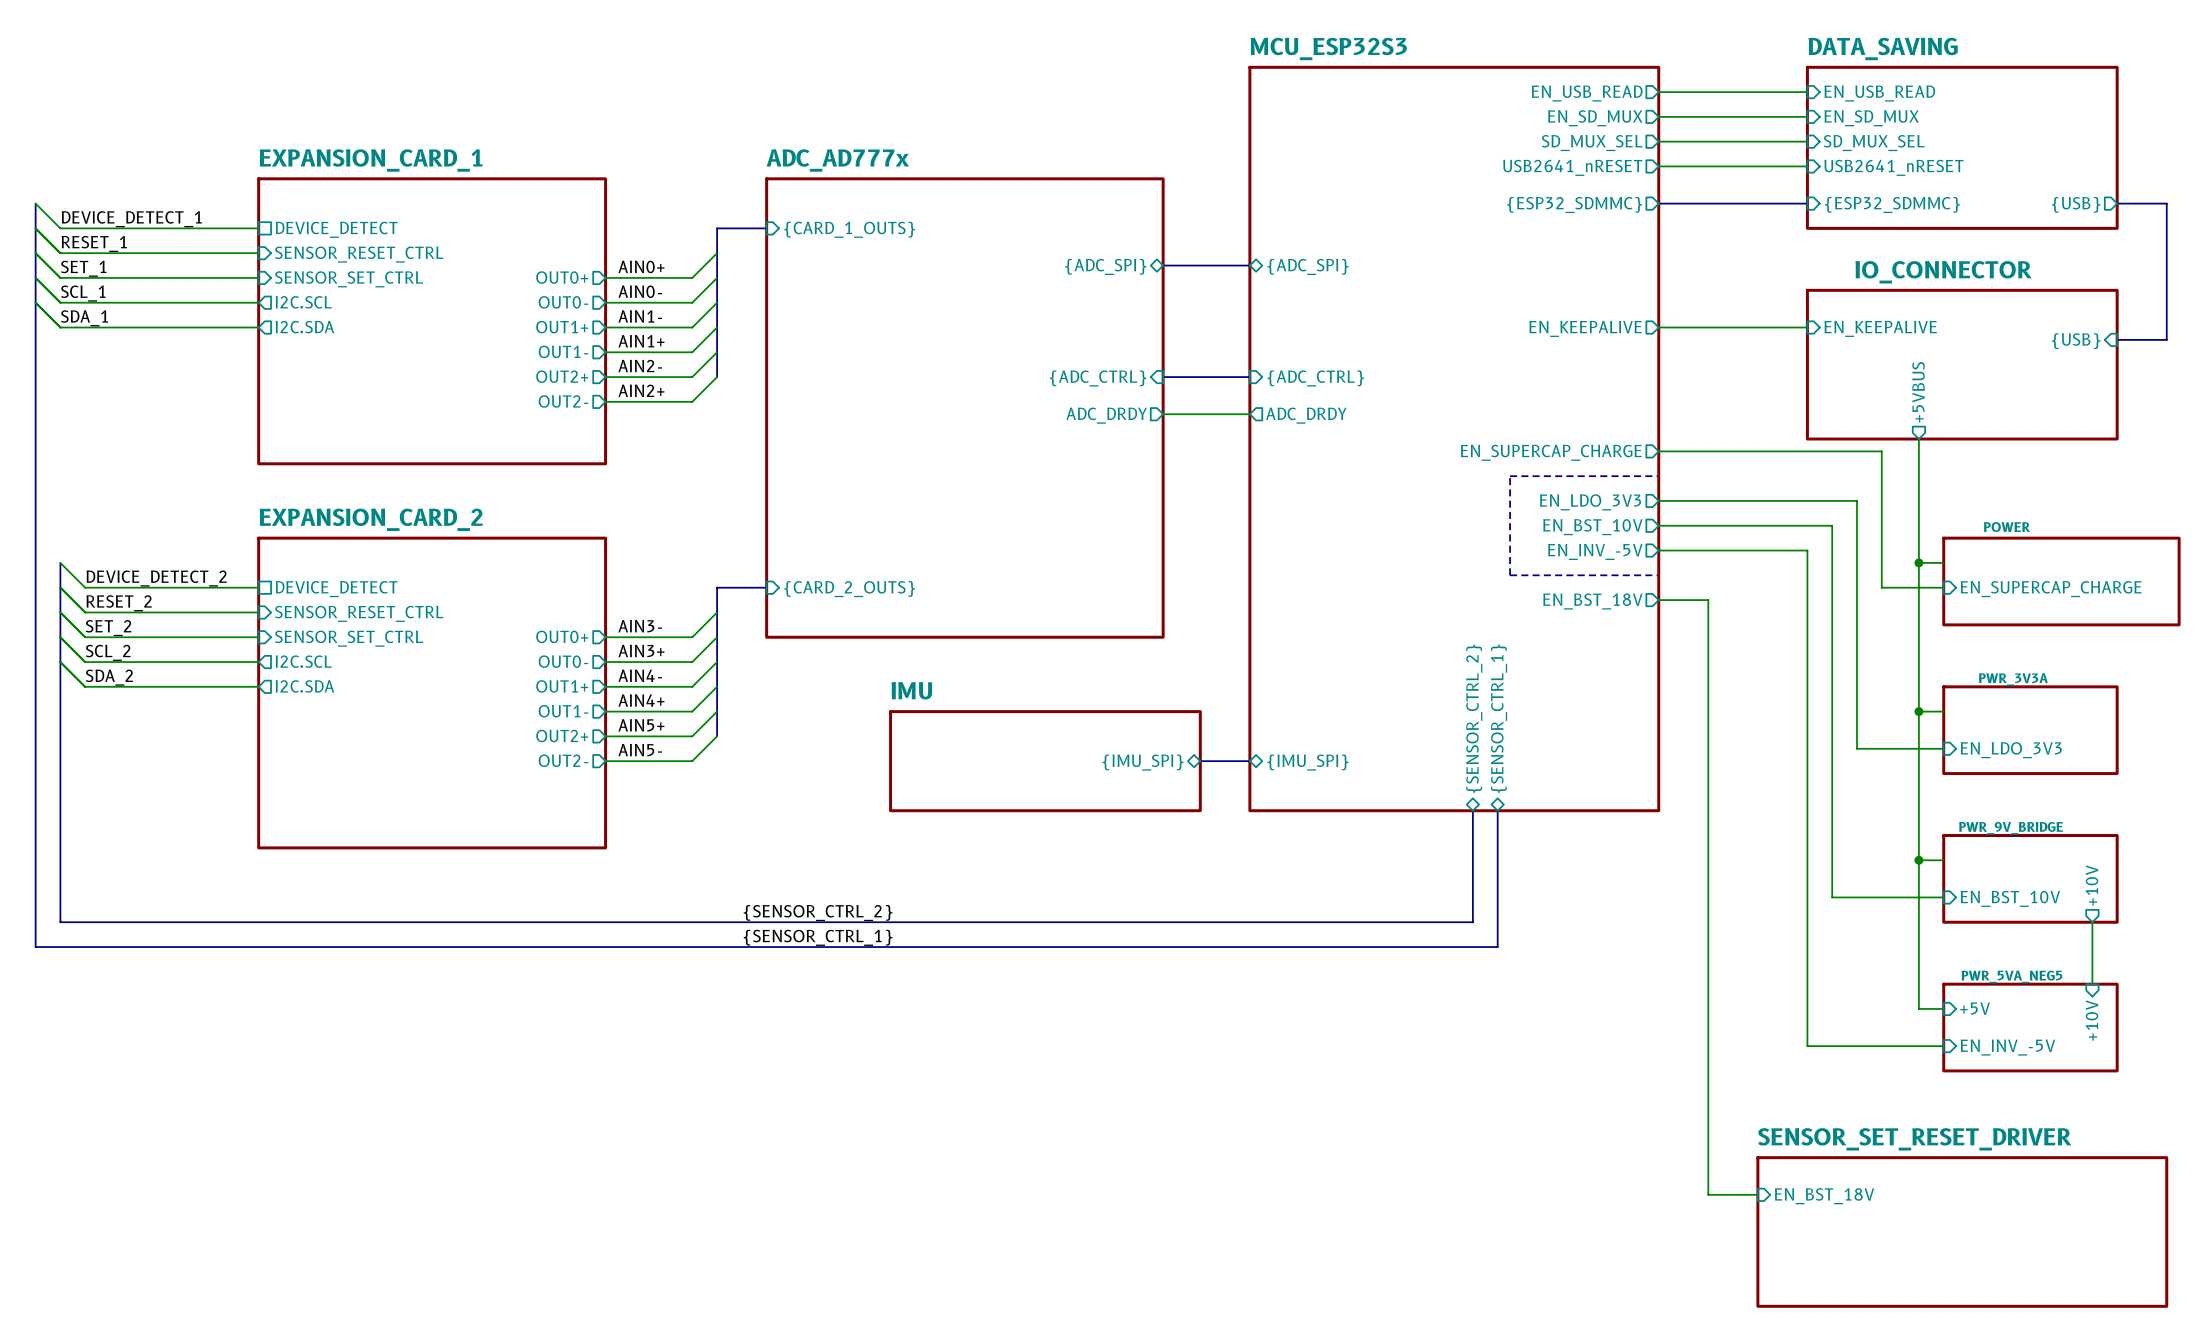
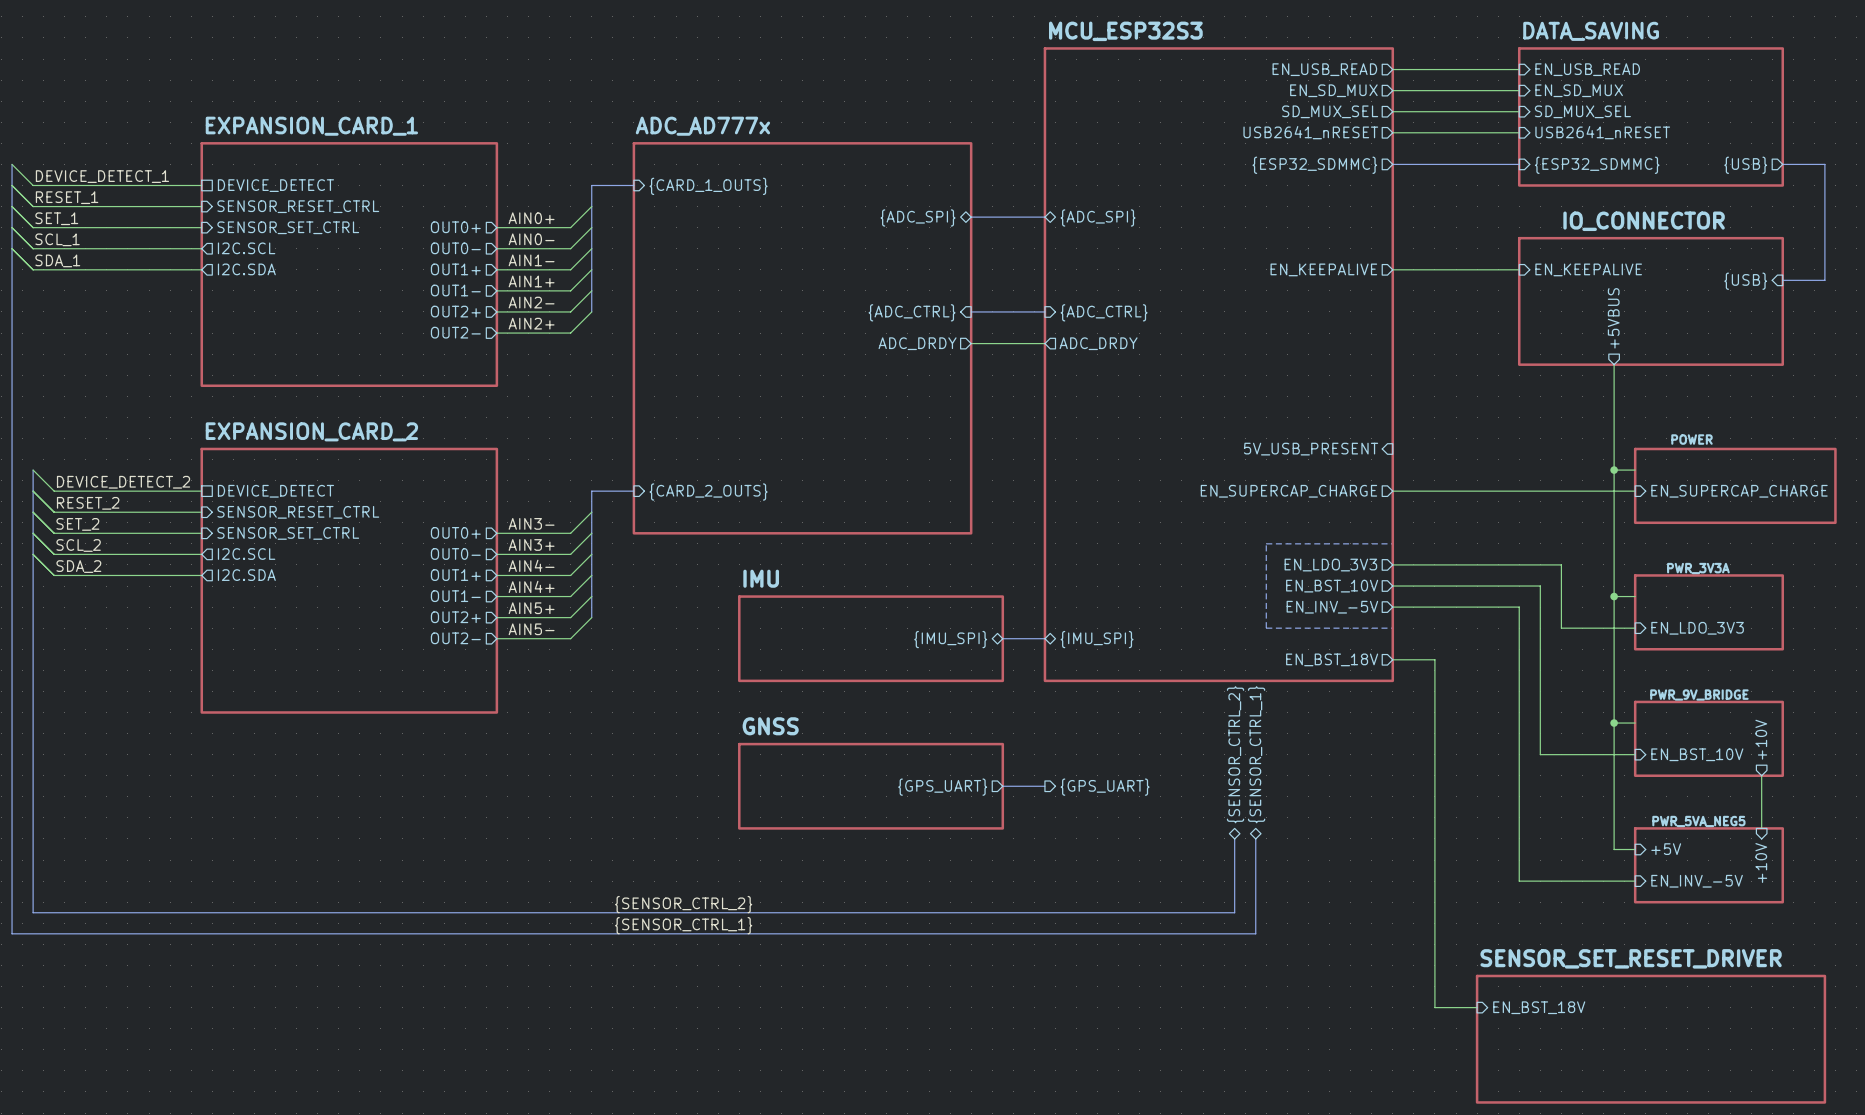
wire: (1658, 451) (1881, 451) (1881, 587) -> (1392, 491) (1582, 491)
sheet pin position: EN_SUPERCAP_CHARGE (1551, 452) -> EN_SUPERCAP_CHARGE (1288, 491)
line: (1658, 476) (1510, 476) (1510, 575) (1658, 575) -> (1392, 543) (1266, 543) (1266, 628) (1392, 628)
wire: (1658, 500) (1856, 500) (1856, 674) -> (1392, 564) (1561, 564)
sheet pin position: EN_LDO_3V3 (1590, 502) -> EN_LDO_3V3 (1330, 565)
wire: (1658, 525) (1832, 525) (1832, 699) -> (1392, 586) (1540, 586)
sheet pin position: EN_BST_10V (1592, 527) -> EN_BST_10V (1332, 586)
sheet pin: none -> 5V_USB_PRESENT (1311, 449)
wire: (1658, 550) (1807, 550) (1807, 723) -> (1392, 607) (1519, 607)
sheet pin position: EN_INV_-5V (1595, 551) -> EN_INV_-5V (1332, 607)
wire: (1658, 600) (1708, 600) (1708, 785) -> (1392, 659) (1434, 659)
sheet pin position: EN_BST_18V (1592, 601) -> EN_BST_18V (1332, 659)
sheet pin position: {SENSOR_CTRL_2} (1474, 718) -> {SENSOR_CTRL_2} (1235, 754)
sheet pin position: {SENSOR_CTRL_1} (1499, 718) -> {SENSOR_CTRL_1} (1256, 754)
bus: (1472, 810) (1472, 922) (60, 922) -> (1234, 838) (1234, 912) (33, 912) (33, 775)
bus: (1497, 810) (1497, 947) (35, 947) -> (1255, 838) (1255, 933) (12, 933) (12, 796)
label position: {SENSOR_CTRL_2} (818, 913) -> {SENSOR_CTRL_2} (683, 904)
sheet GNSS: none -> (871, 786)
bus: none -> (1002, 786) (1044, 786)
sheet pin: none -> {GPS_UART} (942, 787)
sheet pin: none -> {GPS_UART} (1105, 787)
label position: {SENSOR_CTRL_1} (818, 937) -> {SENSOR_CTRL_1} (683, 925)

